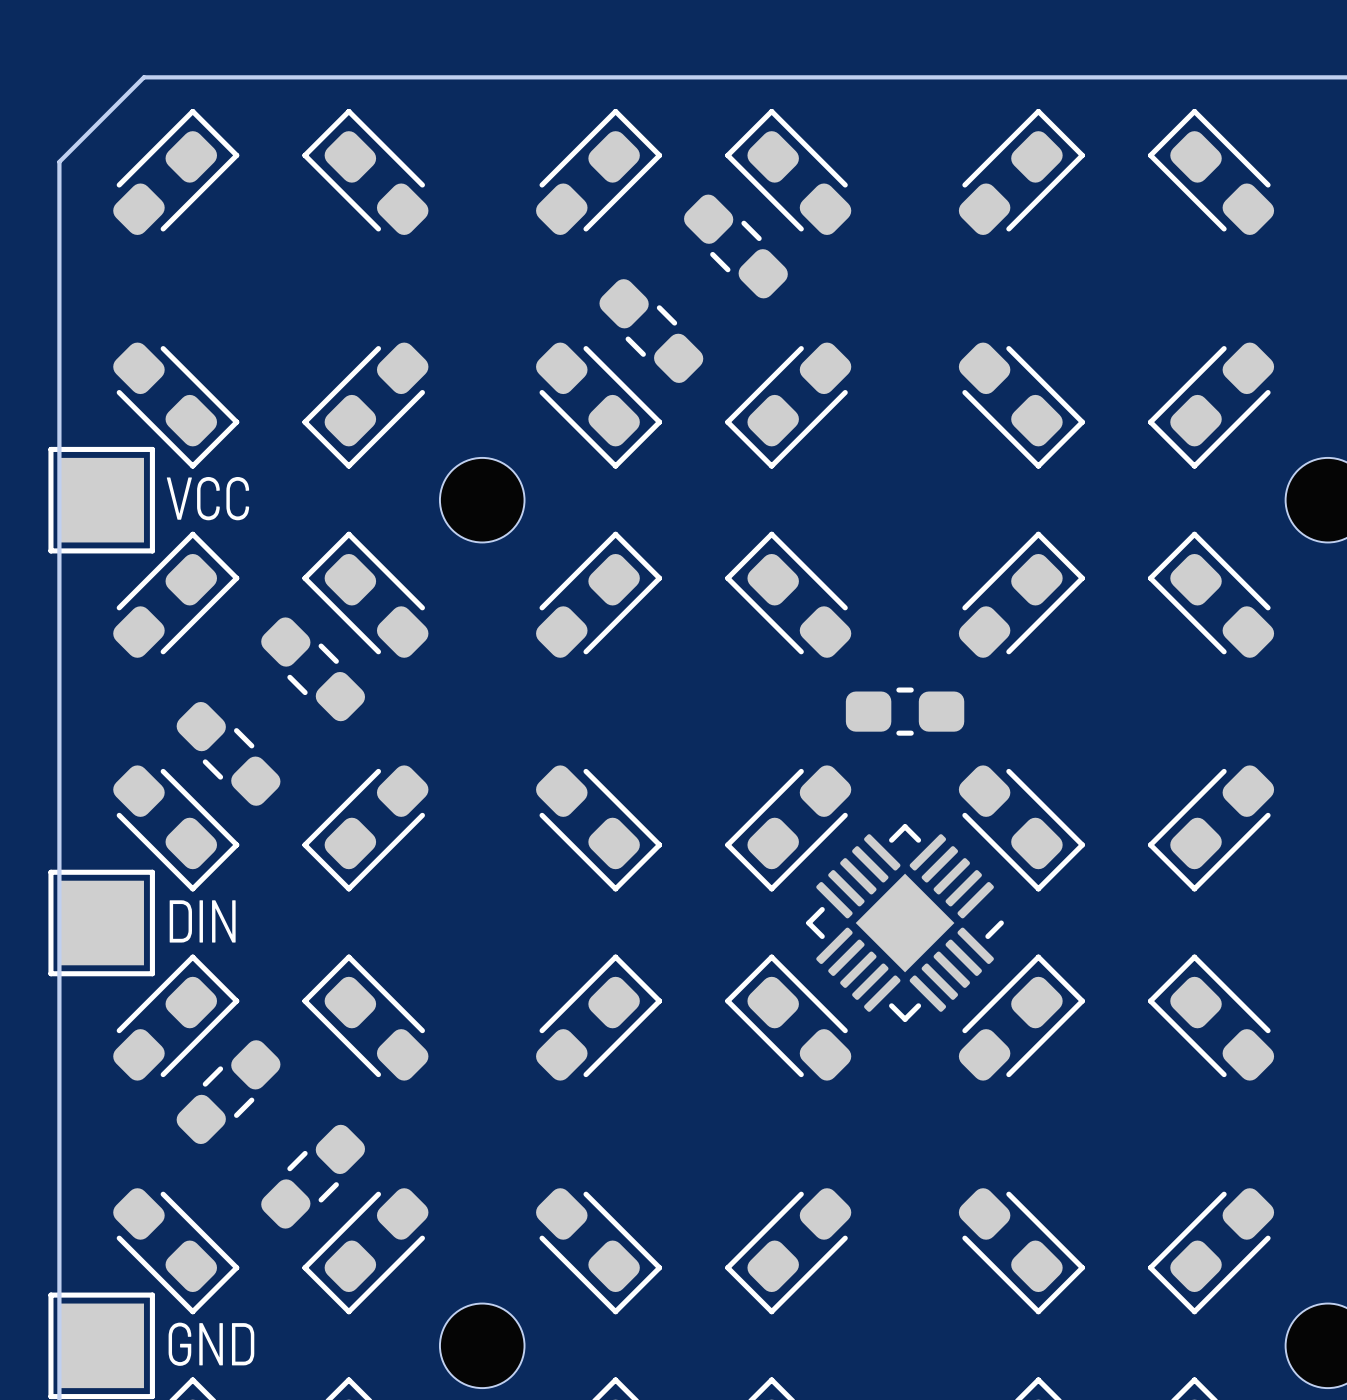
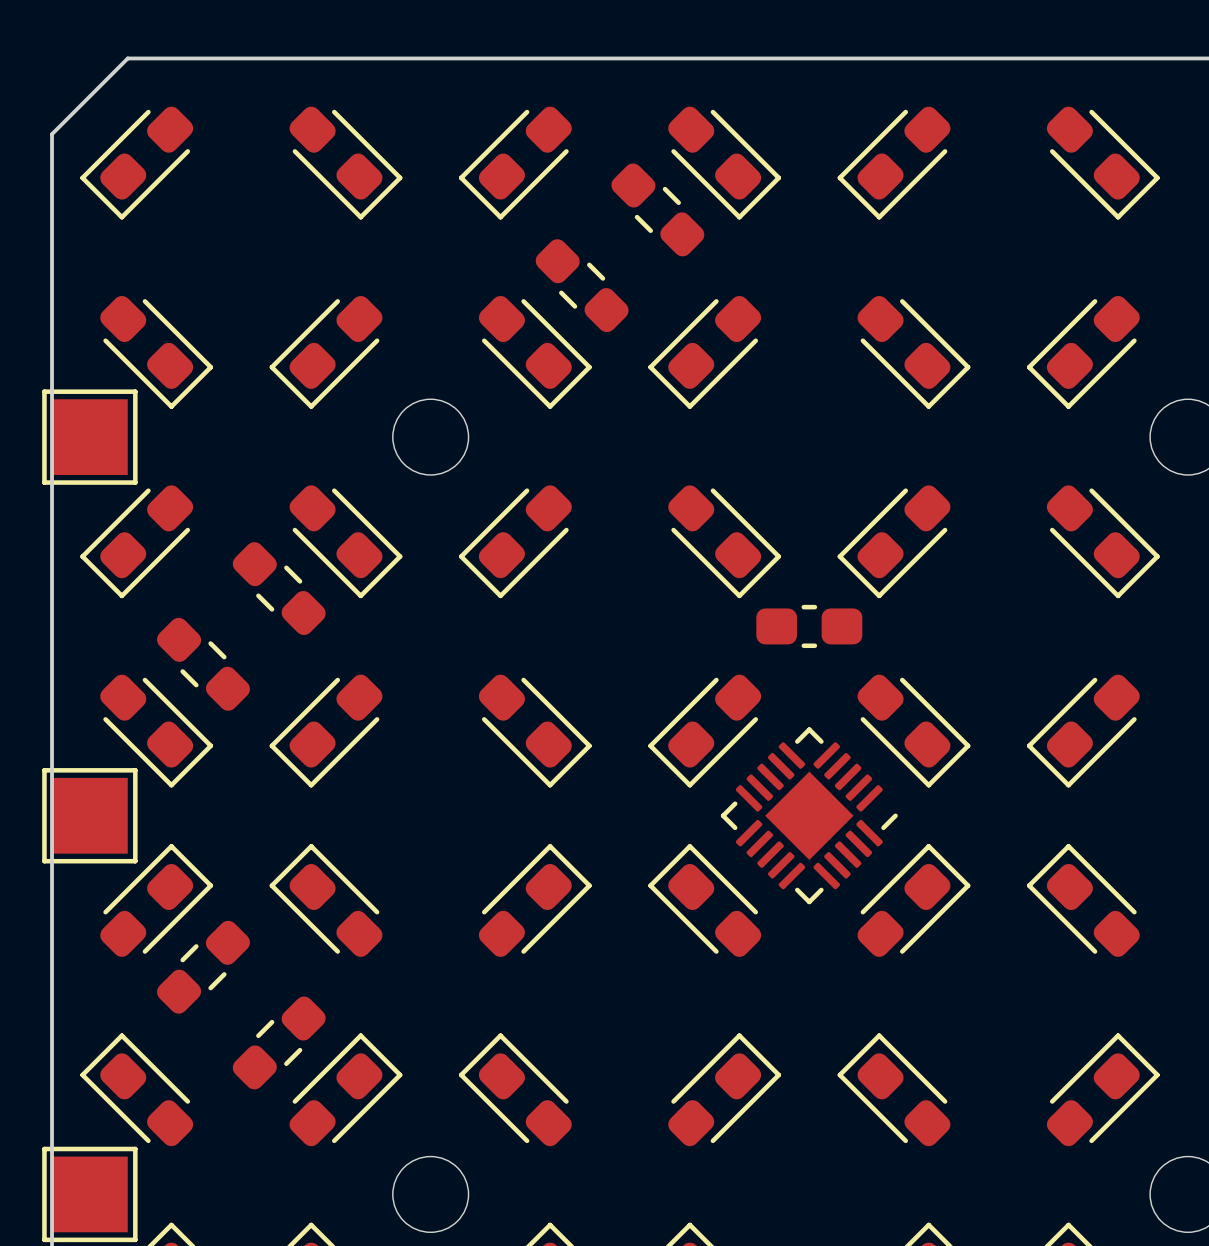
part rotation: 0° (176, 171) -> 180° (136, 163)
part rotation: 0° (365, 171) -> 180° (345, 163)
part rotation: 0° (599, 171) -> 180° (515, 163)
part rotation: 0° (788, 171) -> 180° (724, 163)
part rotation: 0° (1021, 171) -> 180° (894, 163)
part rotation: 0° (1211, 171) -> 180° (1103, 163)
text: VCC (207, 498) -> none
part rotation: 0° (176, 594) -> 180° (136, 541)
part rotation: 0° (365, 594) -> 180° (345, 541)
part rotation: 0° (599, 594) -> 180° (515, 541)
part rotation: 0° (788, 594) -> 180° (724, 541)
part rotation: 0° (1021, 594) -> 180° (894, 541)
part rotation: 0° (1211, 594) -> 180° (1103, 541)
part footprint: [806, 824, 1004, 1022] -> [720, 727, 898, 905]
text: DIN (202, 921) -> none
part rotation: 0° (176, 1251) -> 180° (136, 1089)
part rotation: 0° (365, 1251) -> 180° (345, 1089)
part rotation: 0° (599, 1251) -> 180° (515, 1089)
part rotation: 0° (788, 1251) -> 180° (724, 1089)
part rotation: 0° (1021, 1251) -> 180° (894, 1089)
part rotation: 0° (1211, 1251) -> 180° (1103, 1089)
text: GND (211, 1344) -> none

